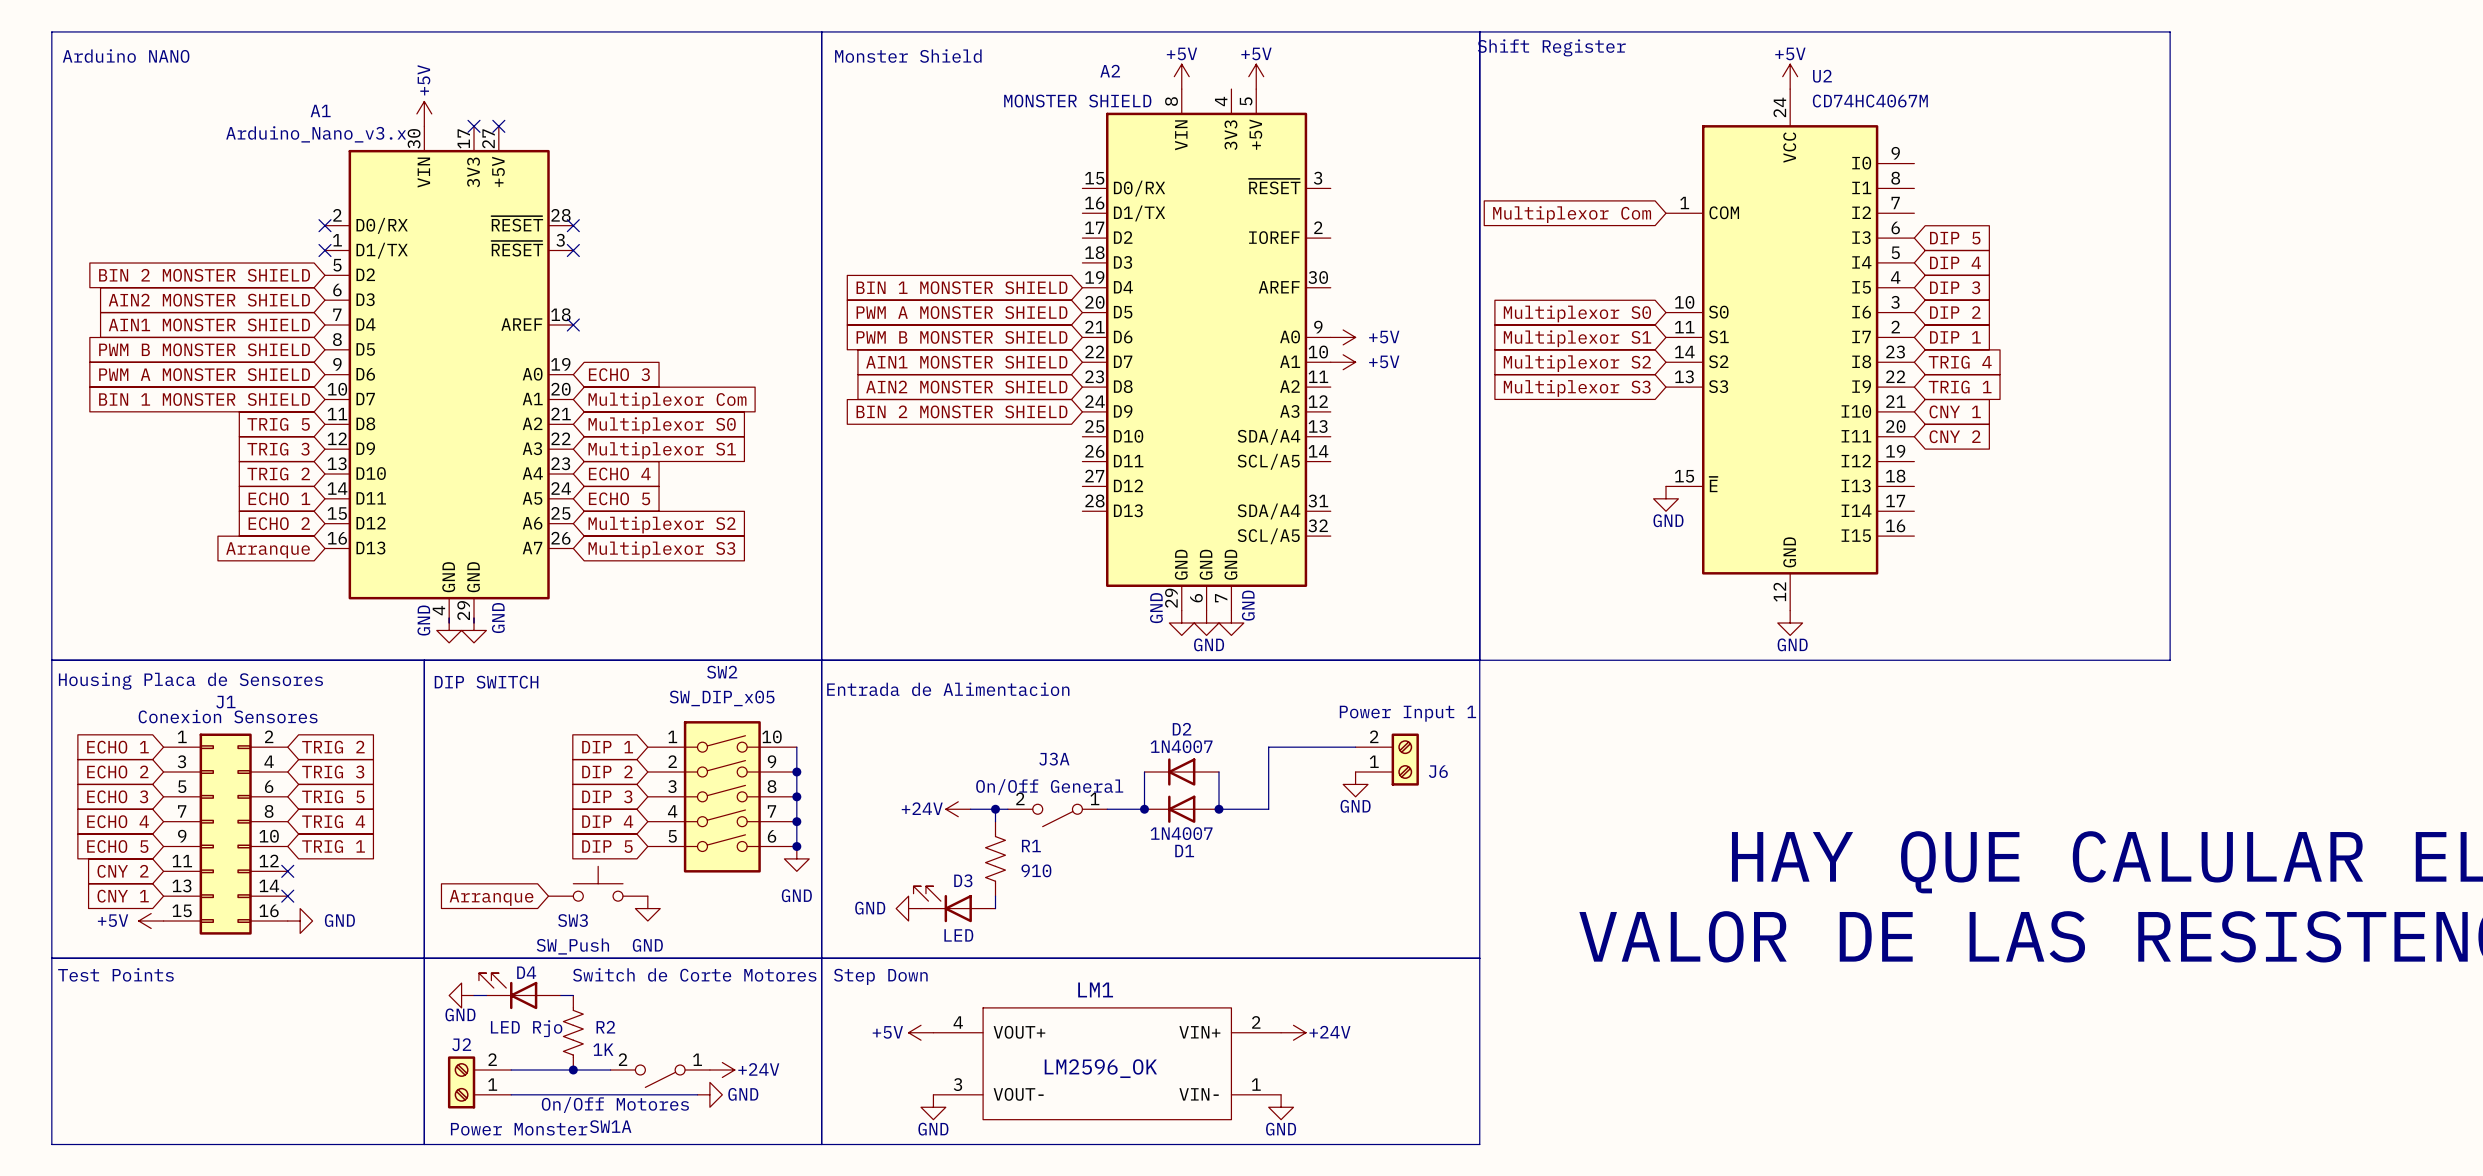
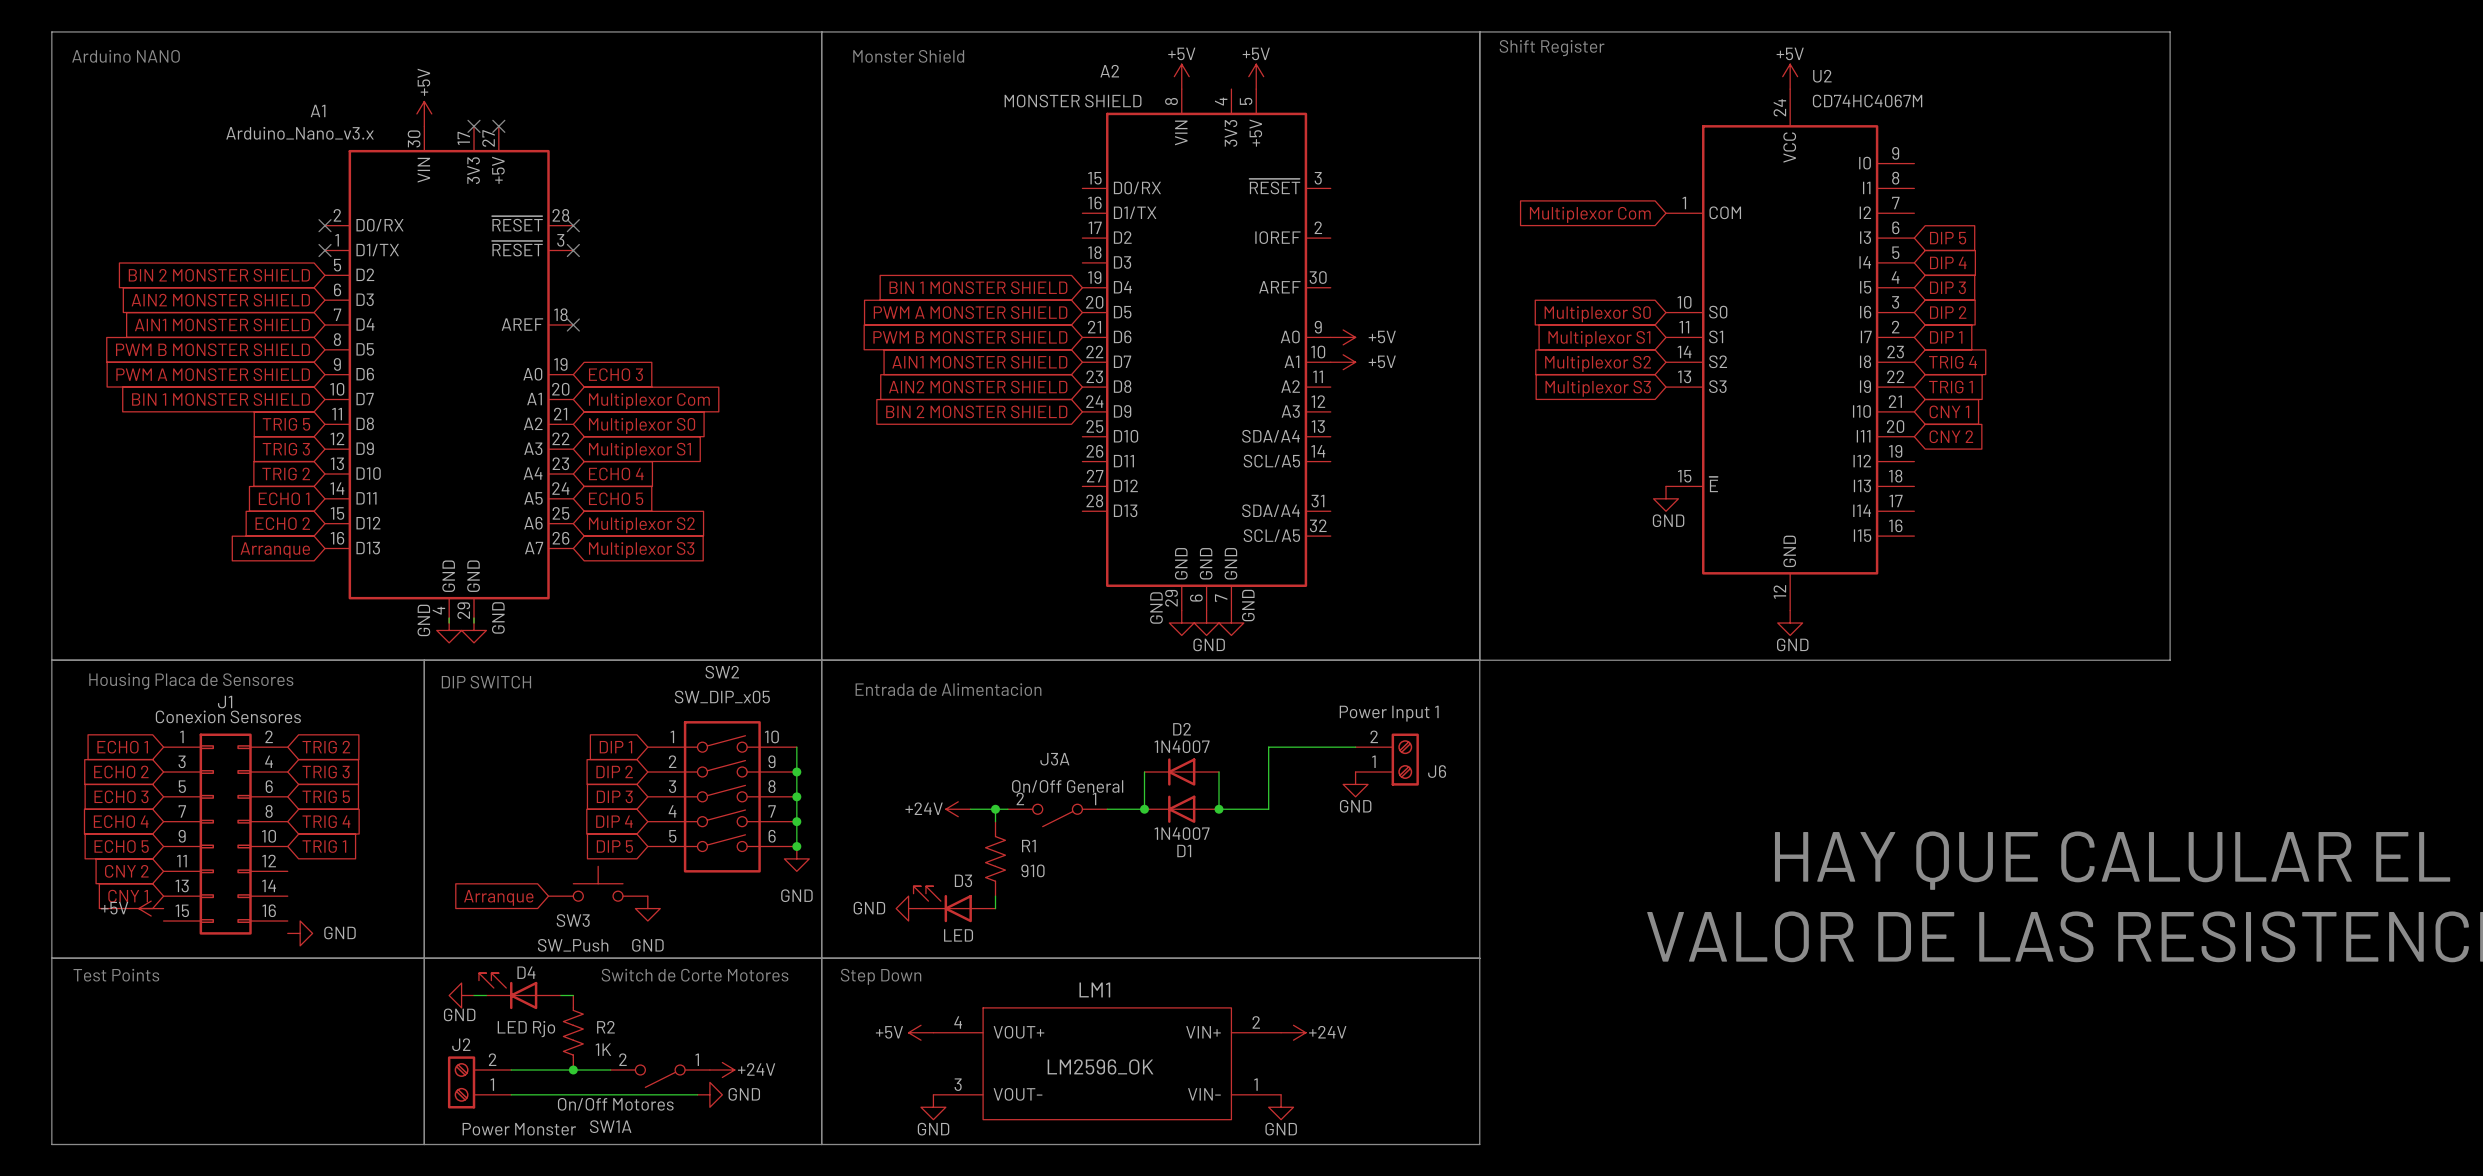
no-connect mark: (287, 871) -> none
no-connect mark: (287, 896) -> none
power symbol position: +5V (151, 921) -> +5V (151, 908)
power symbol position: GND (300, 921) -> GND (300, 933)

